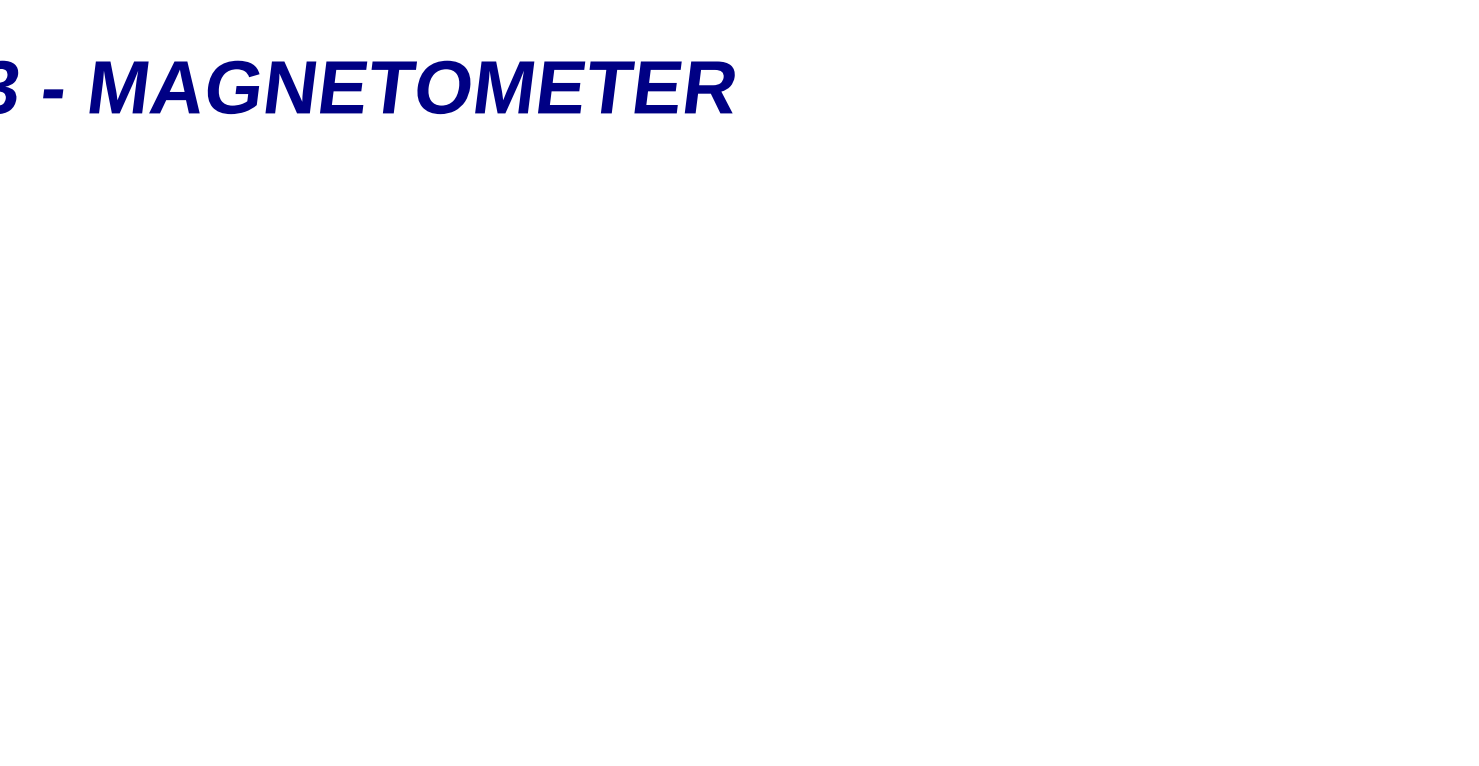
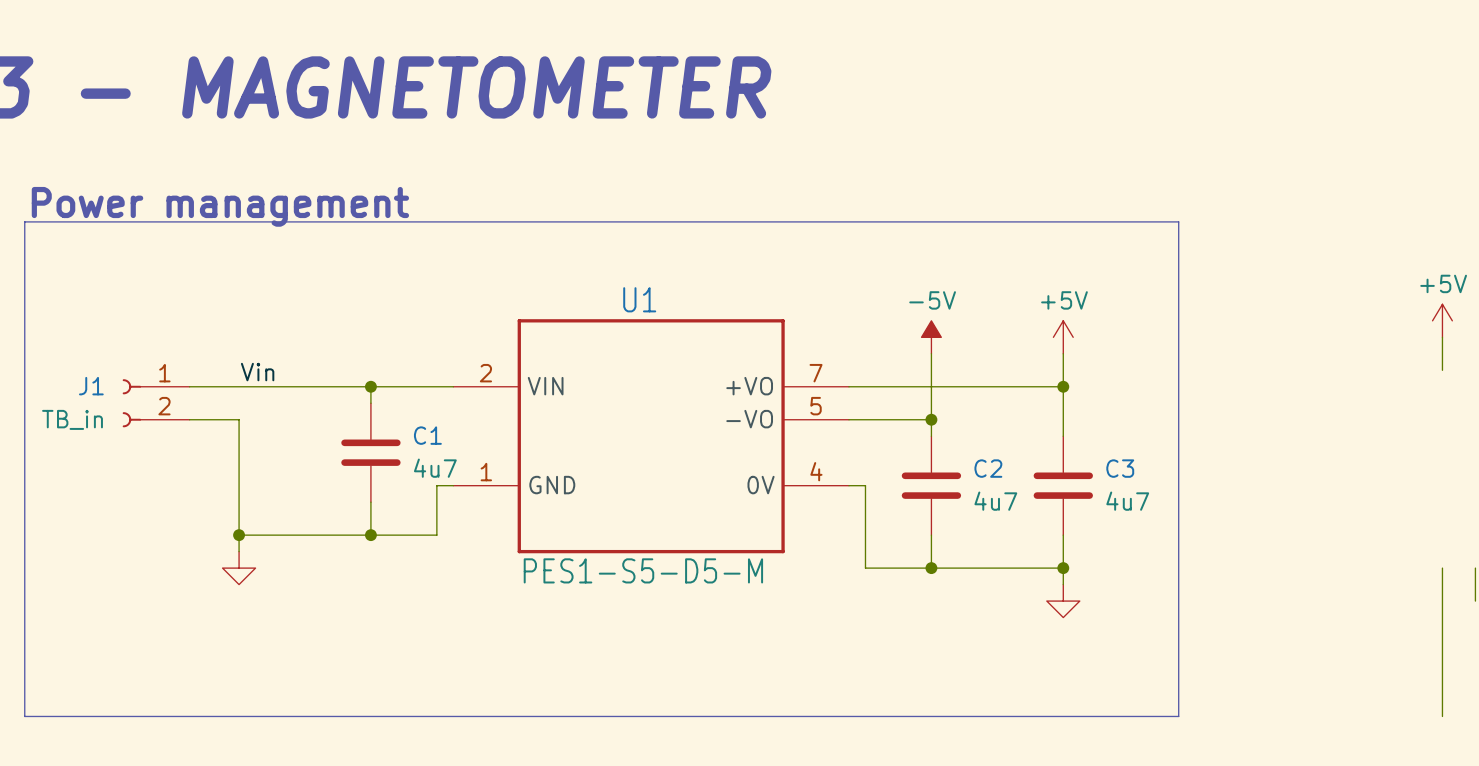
text: none -> Power management (220, 206)
line: none -> (24, 221) (24, 716) (1178, 716) (1178, 221) (24, 221)
power symbol: none -> +5V (1442, 320)
power symbol: none -> -5V (931, 337)
power symbol: none -> +5V (1063, 337)
wire: none -> (1442, 337) (1442, 370)
wire: none -> (931, 353) (931, 436)
wire: none -> (1063, 353) (1063, 436)
label: none -> Vin (257, 372)
wire: none -> (189, 386) (453, 386)
wire: none -> (370, 386) (370, 403)
junction: none -> (370, 386)
wire: none -> (848, 386) (1063, 386)
junction: none -> (1063, 386)
J1: none -> TB_in (156, 403)
wire: none -> (189, 419) (239, 419) (239, 551)
wire: none -> (848, 419) (931, 419)
junction: none -> (931, 419)
U1: none -> PES1-S5-D5-M (651, 436)
C1: none -> 4u7 (370, 452)
wire: none -> (453, 485) (436, 485) (436, 535) (239, 535)
wire: none -> (848, 485) (865, 485) (865, 568) (1063, 568)
C2: none -> 4u7 (931, 485)
C3: none -> 4u7 (1063, 485)
wire: none -> (370, 502) (370, 535)
junction: none -> (239, 535)
junction: none -> (370, 535)
wire: none -> (931, 535) (931, 568)
wire: none -> (1063, 535) (1063, 584)
power symbol: none -> (239, 568)
junction: none -> (931, 568)
junction: none -> (1063, 568)
wire: none -> (1442, 568) (1442, 716)
wire: none -> (1475, 568) (1475, 601)
power symbol: none -> (1063, 601)

